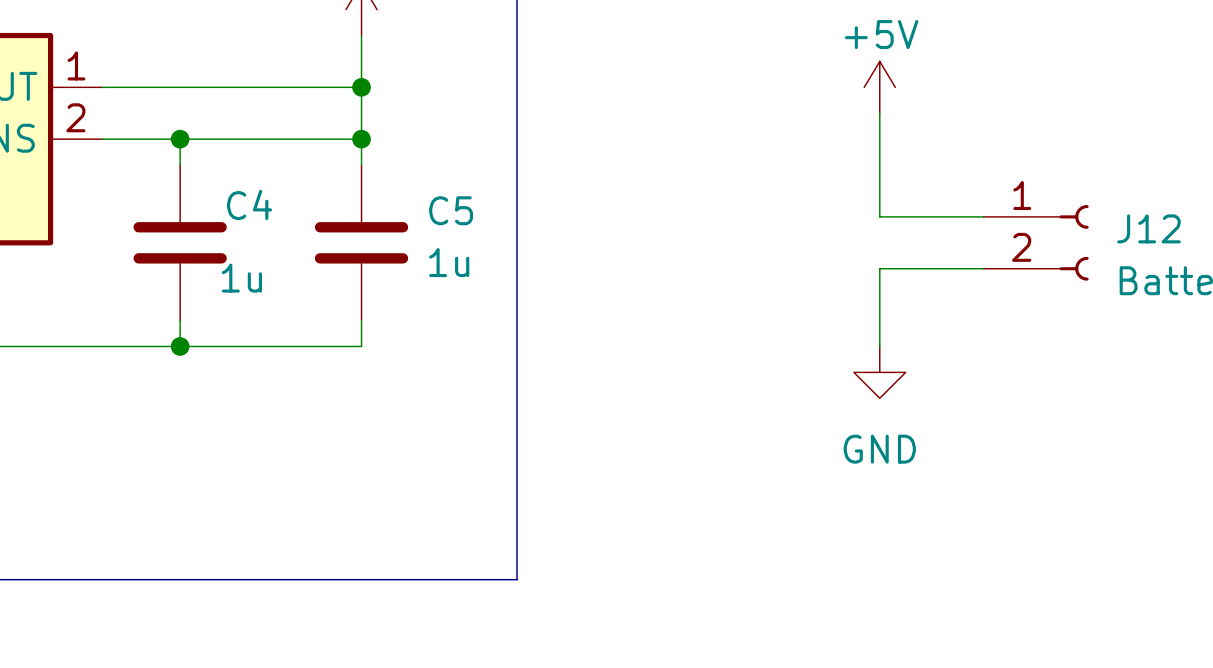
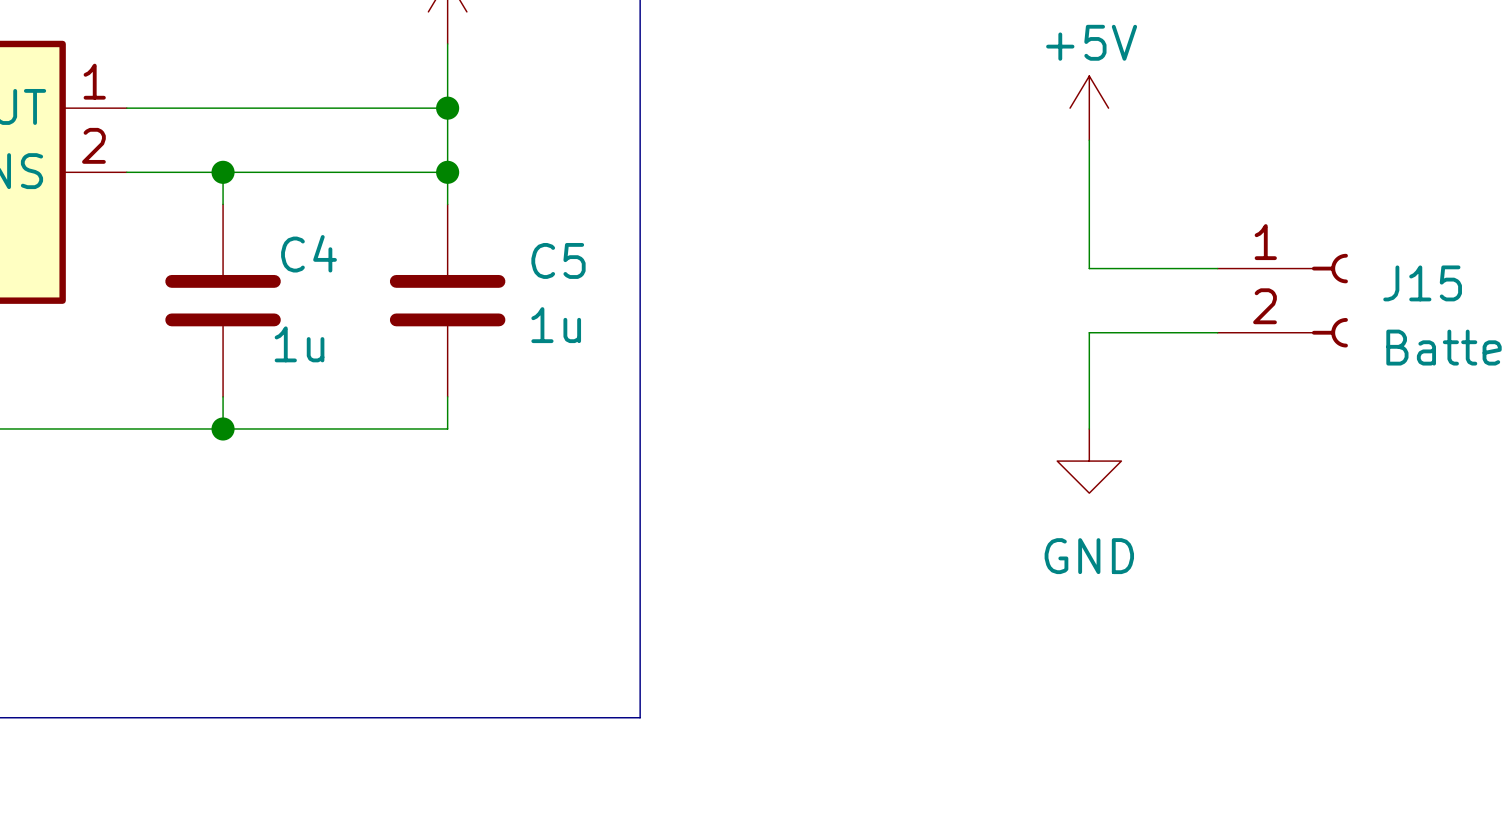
J12 name: J12 (1148, 228) -> J15 (1422, 283)

